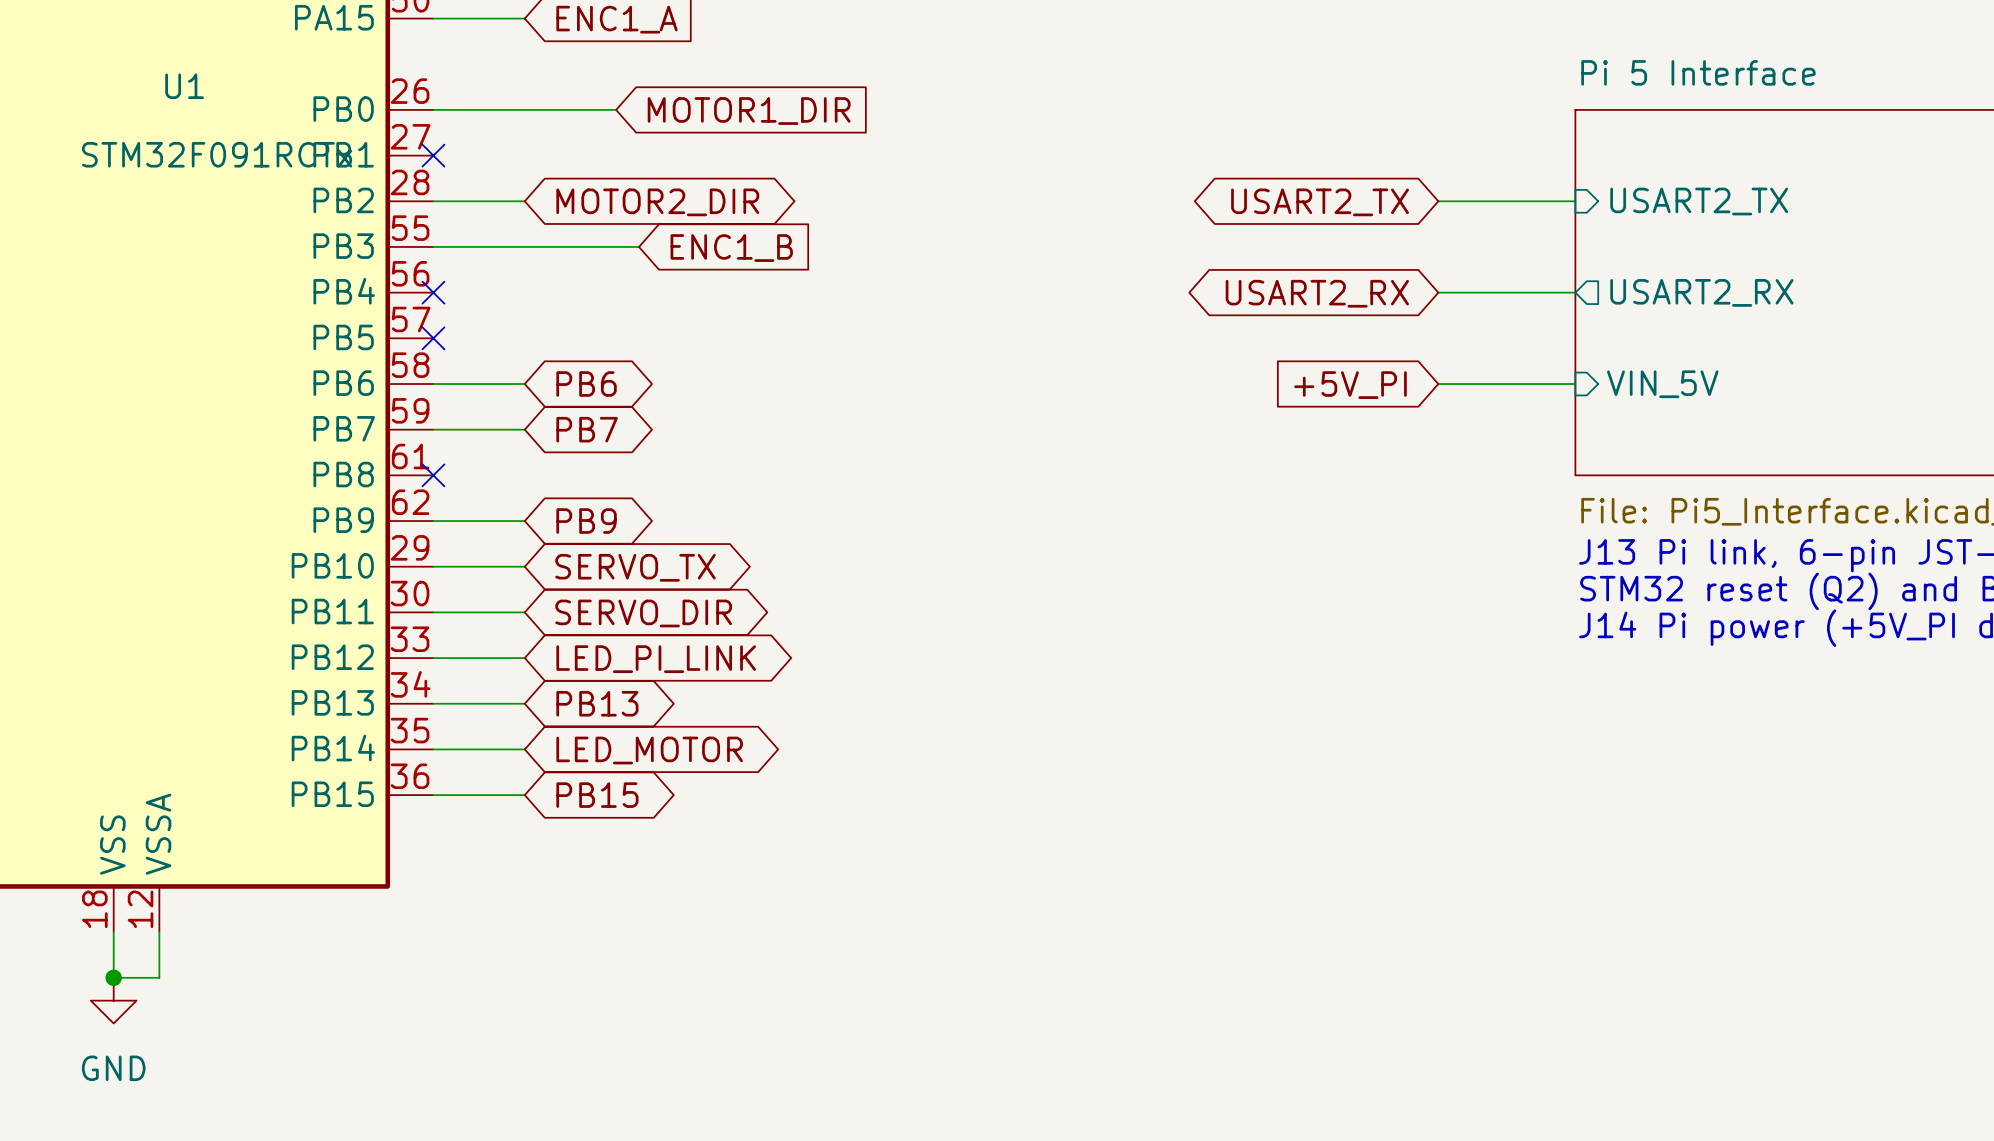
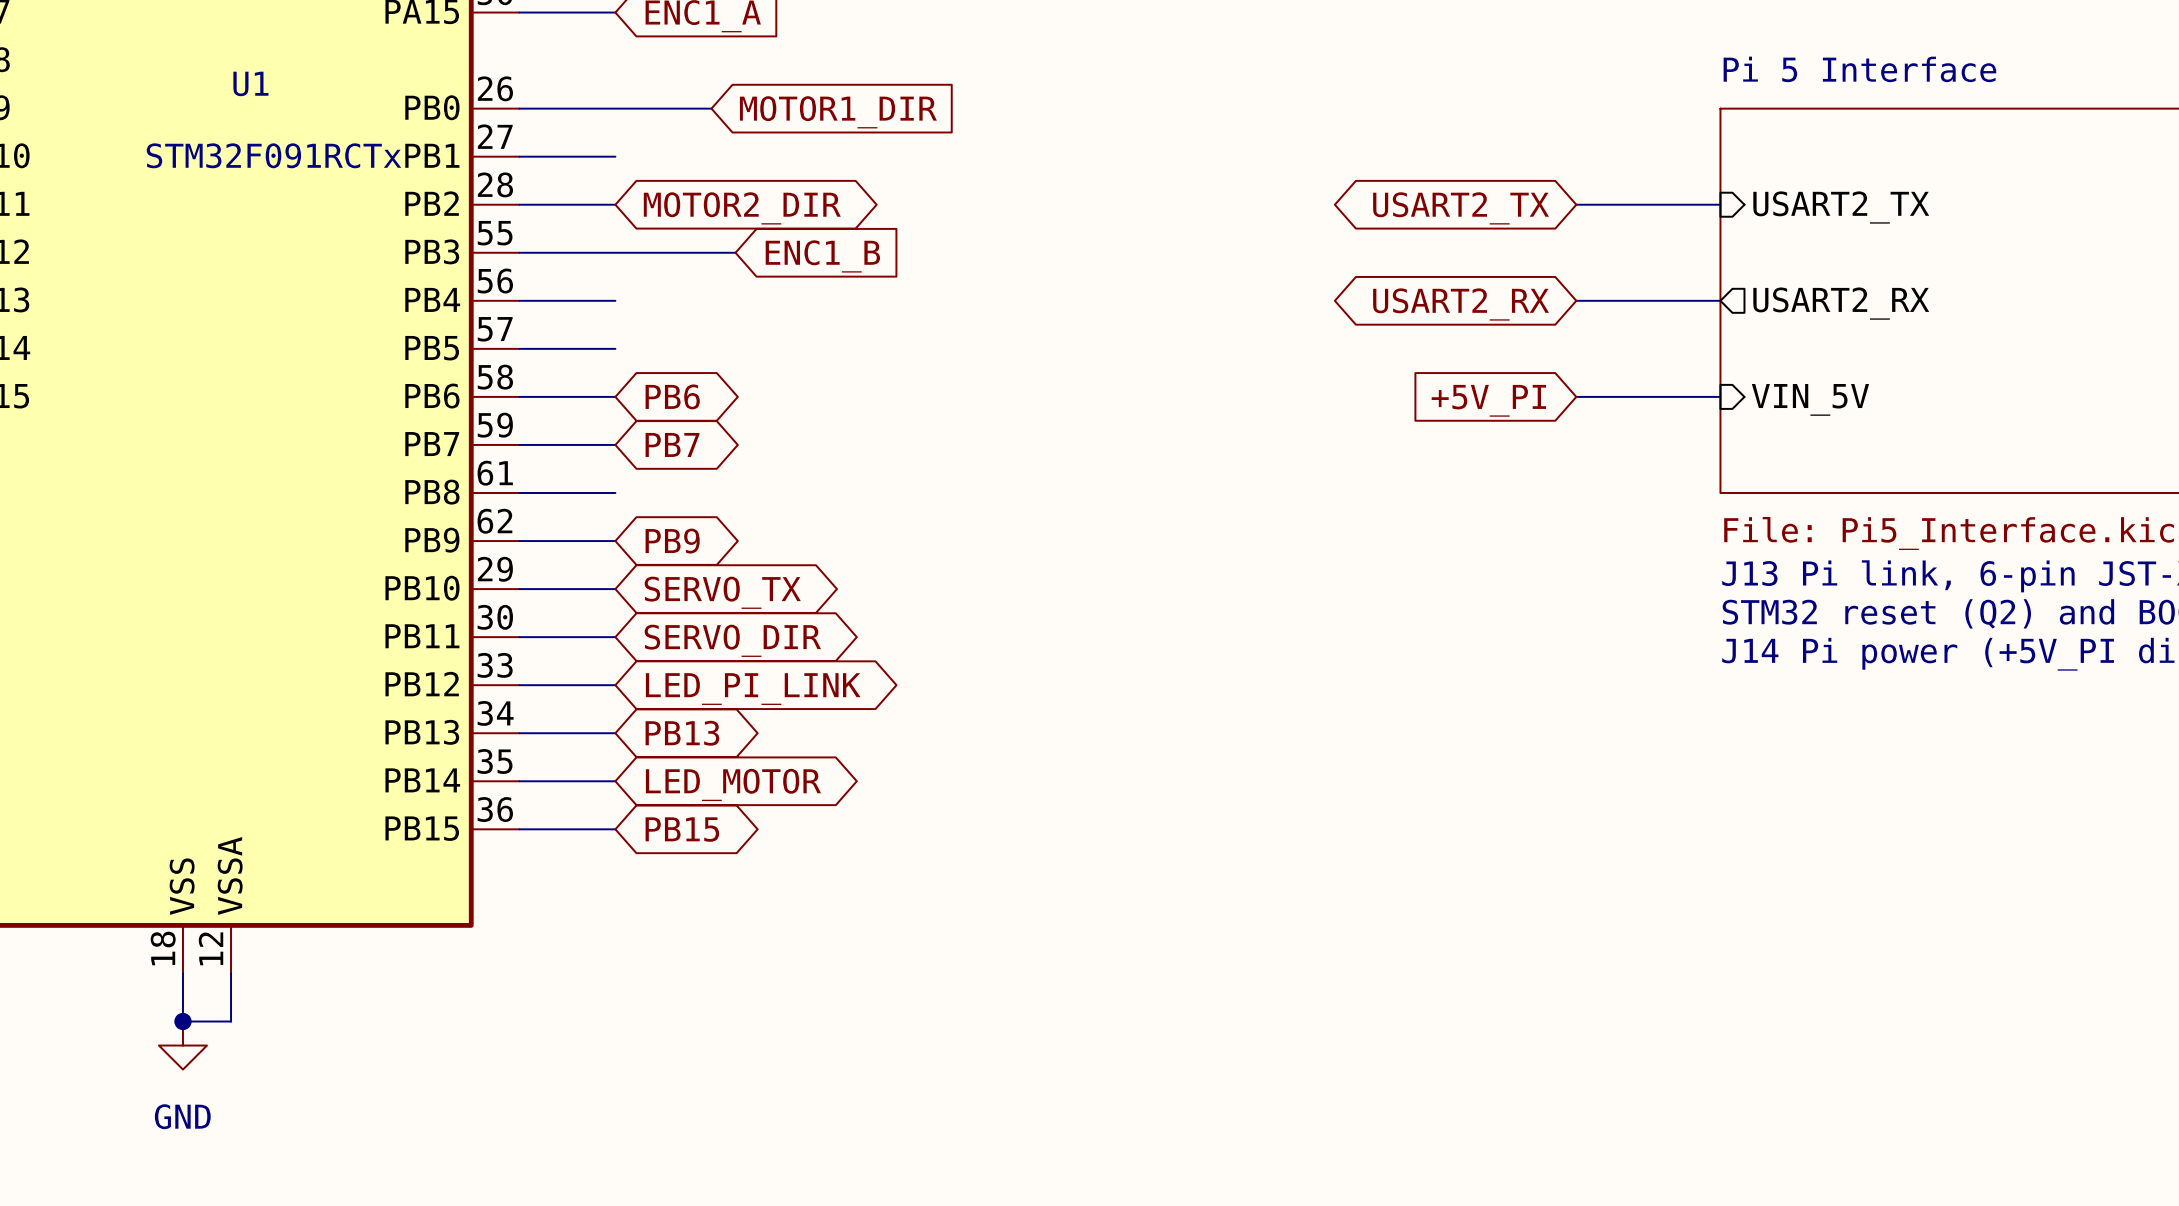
wire: none -> (519, 156) (615, 156)
no-connect mark: (433, 155) -> none
wire: none -> (519, 300) (615, 300)
no-connect mark: (433, 292) -> none
wire: none -> (519, 348) (615, 348)
no-connect mark: (433, 338) -> none
wire: none -> (519, 493) (615, 493)
no-connect mark: (433, 475) -> none

